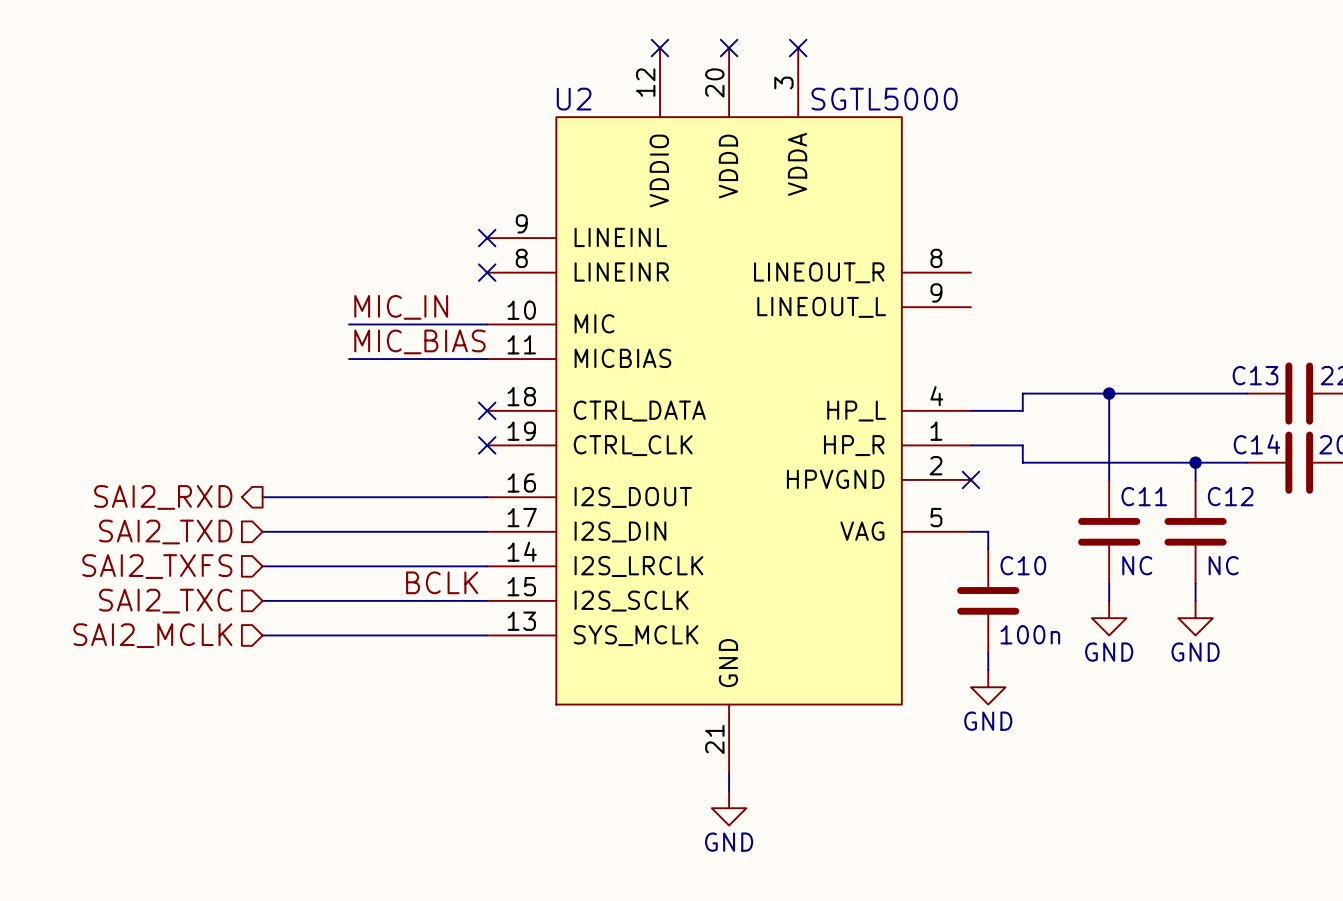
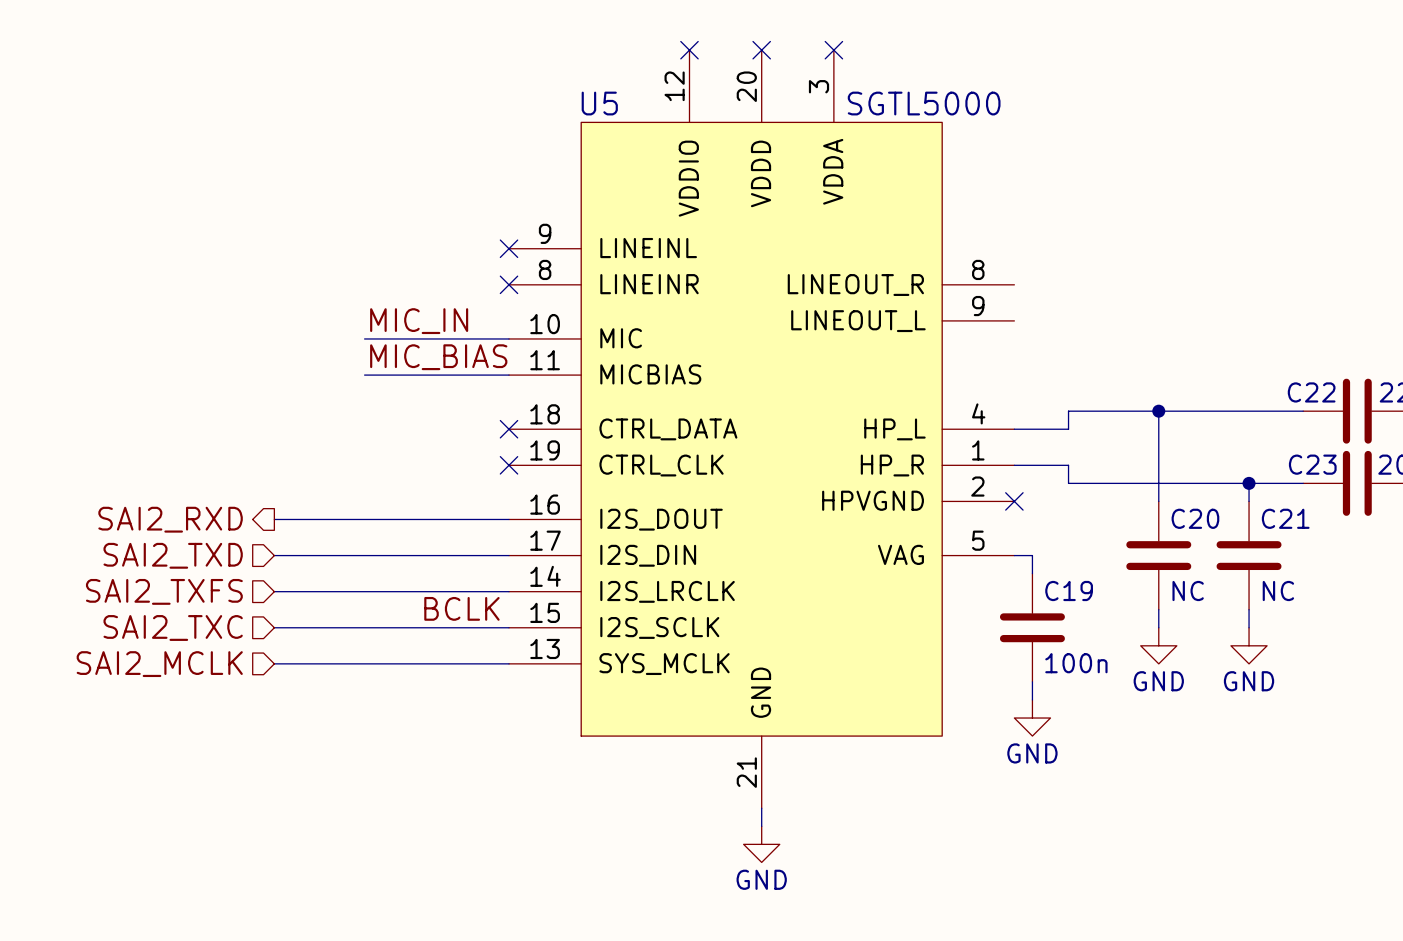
U2 name: U2 (574, 99) -> U5 (599, 103)
C13 name: C13 (1255, 375) -> C22 (1311, 392)
C14 name: C14 (1256, 444) -> C23 (1312, 464)
C11 name: C11 (1144, 496) -> C20 (1195, 518)
C12 name: C12 (1230, 496) -> C21 (1285, 518)
C10 name: C10 (1023, 565) -> C19 (1069, 591)

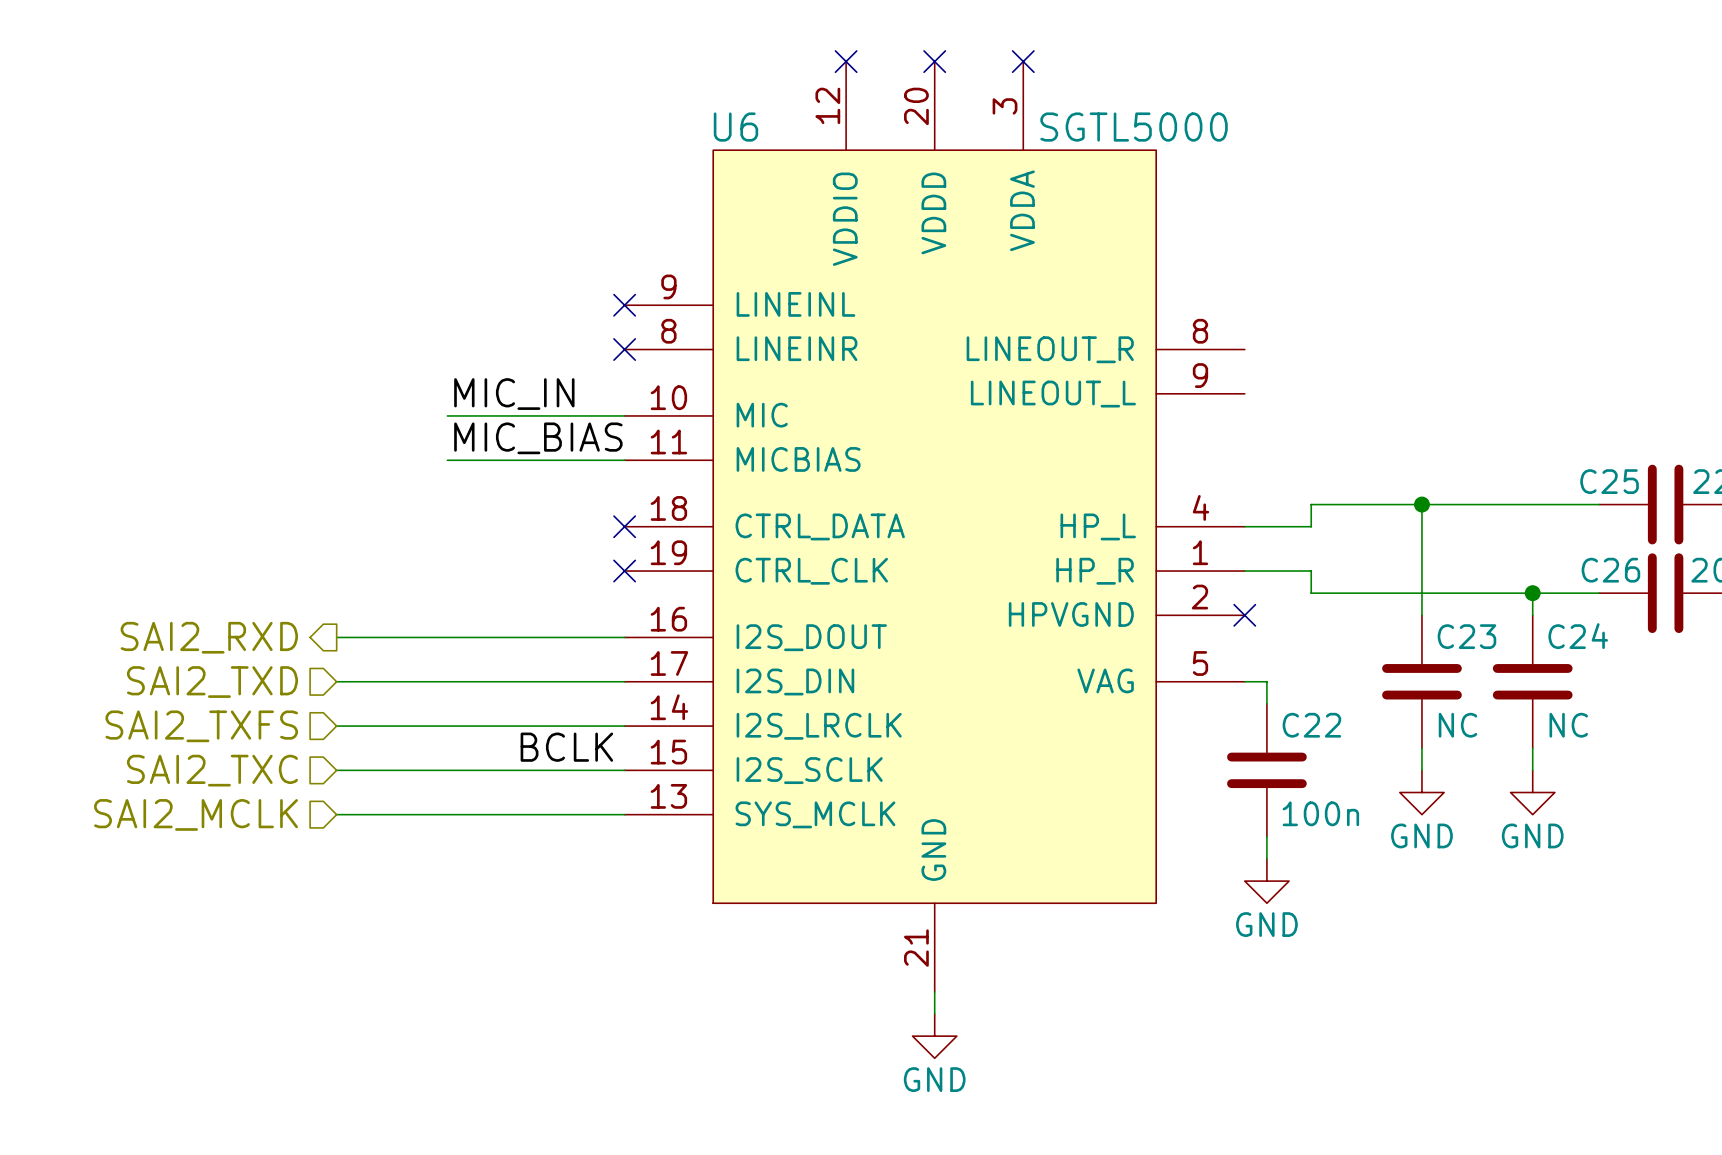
U5 name: U5 (599, 103) -> U6 (735, 127)
C22 name: C22 (1311, 392) -> C25 (1609, 481)
C23 name: C23 (1312, 464) -> C26 (1610, 570)
C20 name: C20 (1195, 518) -> C23 (1466, 636)
C21 name: C21 (1285, 518) -> C24 (1578, 636)
C19 name: C19 (1069, 591) -> C22 (1311, 725)

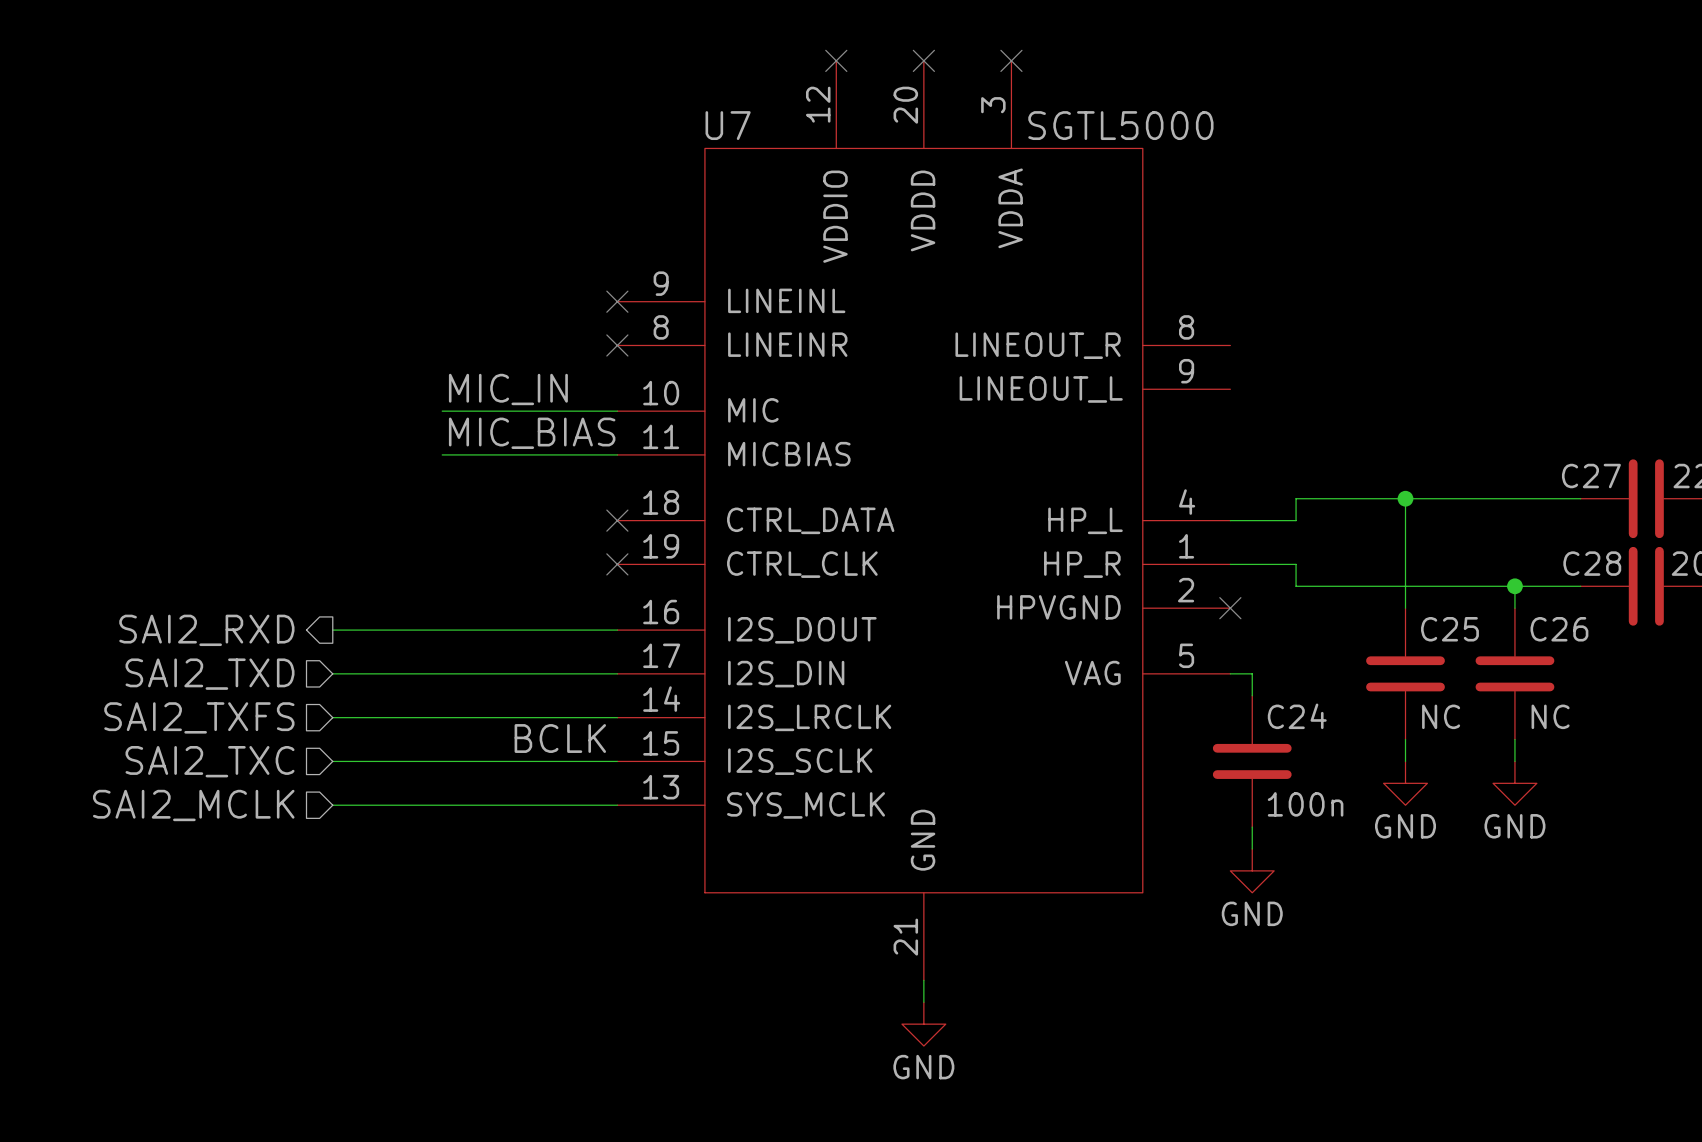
U6 name: U6 (735, 127) -> U7 (728, 125)
C25 name: C25 (1609, 481) -> C27 (1591, 476)
C26 name: C26 (1610, 570) -> C28 (1592, 563)
C23 name: C23 (1466, 636) -> C25 (1449, 629)
C24 name: C24 (1578, 636) -> C26 (1559, 629)
C22 name: C22 (1311, 725) -> C24 (1297, 716)

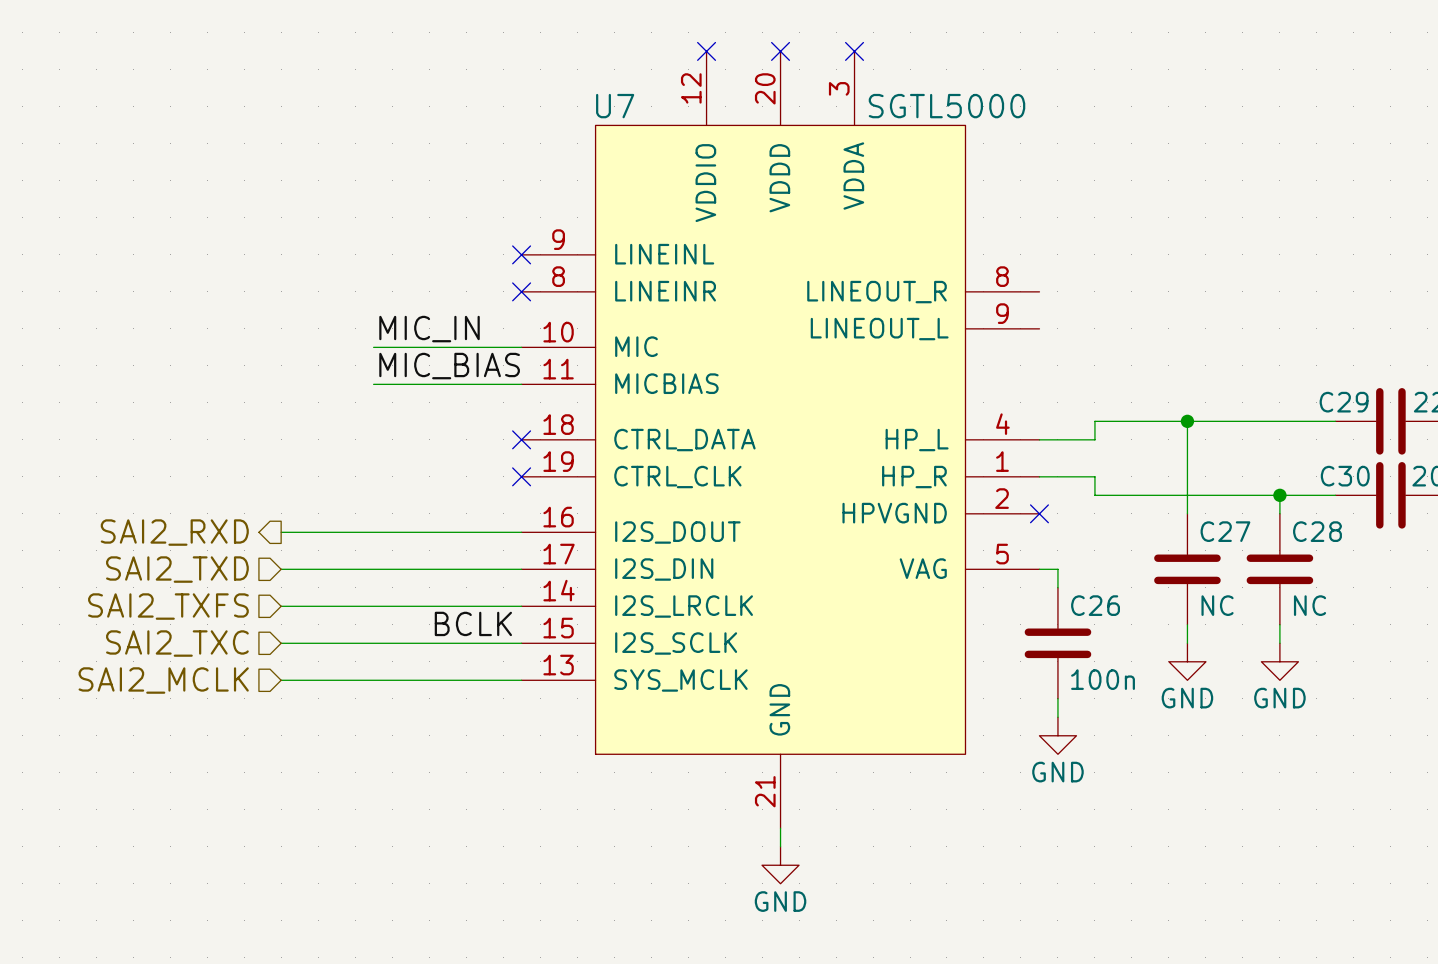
C27 name: C27 (1591, 476) -> C29 (1344, 402)
C28 name: C28 (1592, 563) -> C30 (1345, 476)
C25 name: C25 (1449, 629) -> C27 (1225, 531)
C26 name: C26 (1559, 629) -> C28 (1317, 531)
C24 name: C24 (1297, 716) -> C26 (1095, 605)

